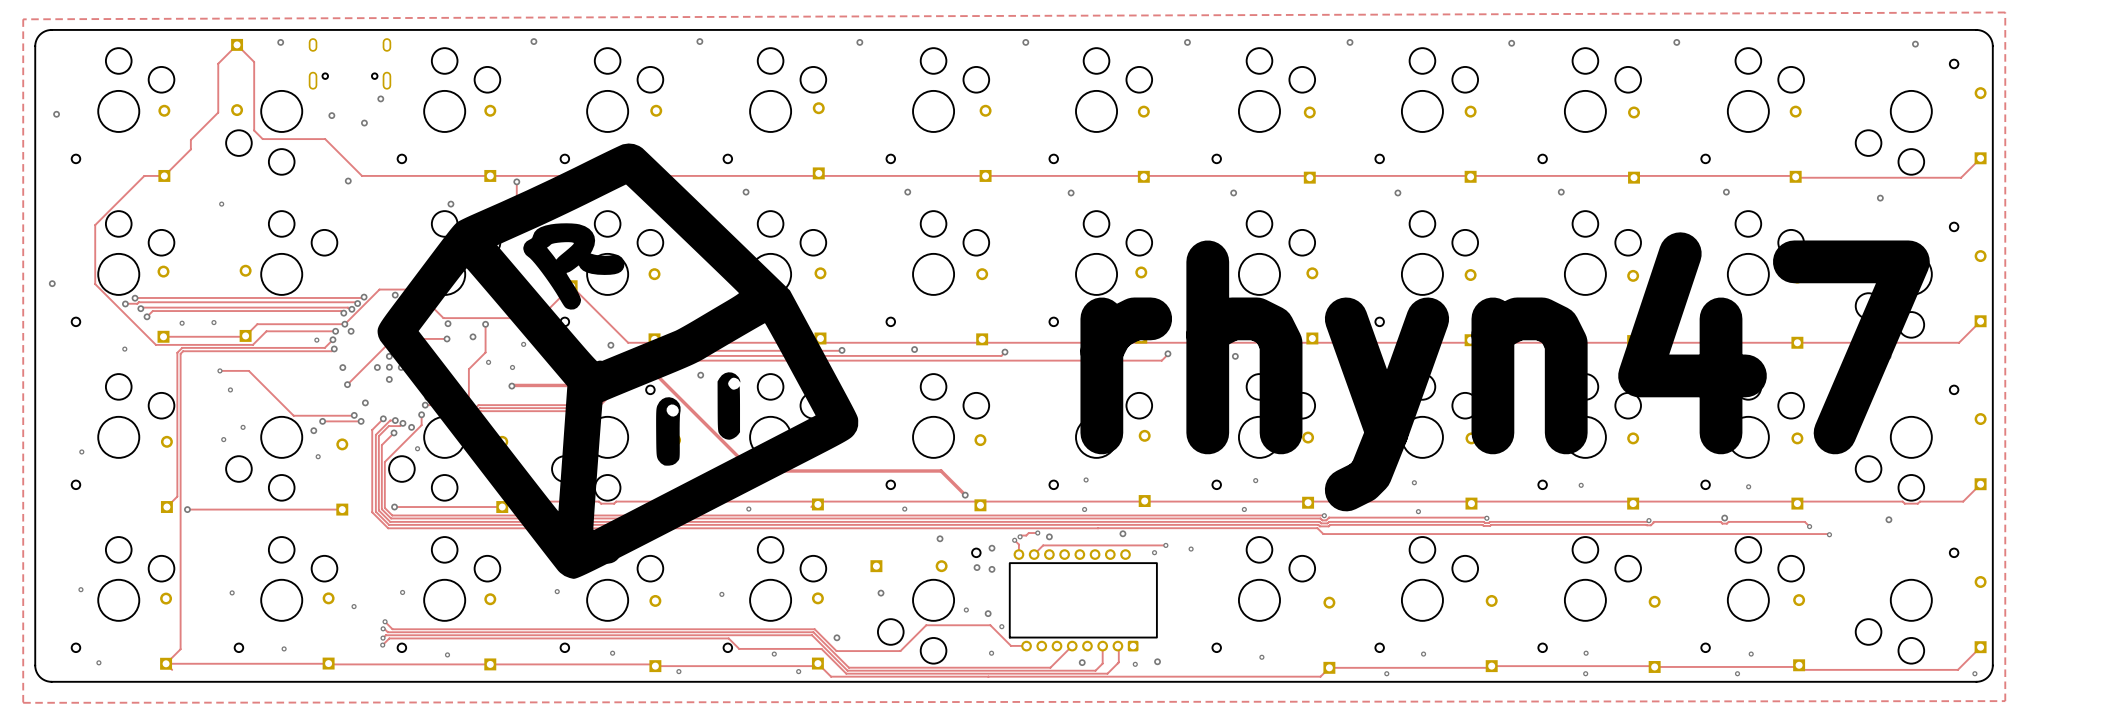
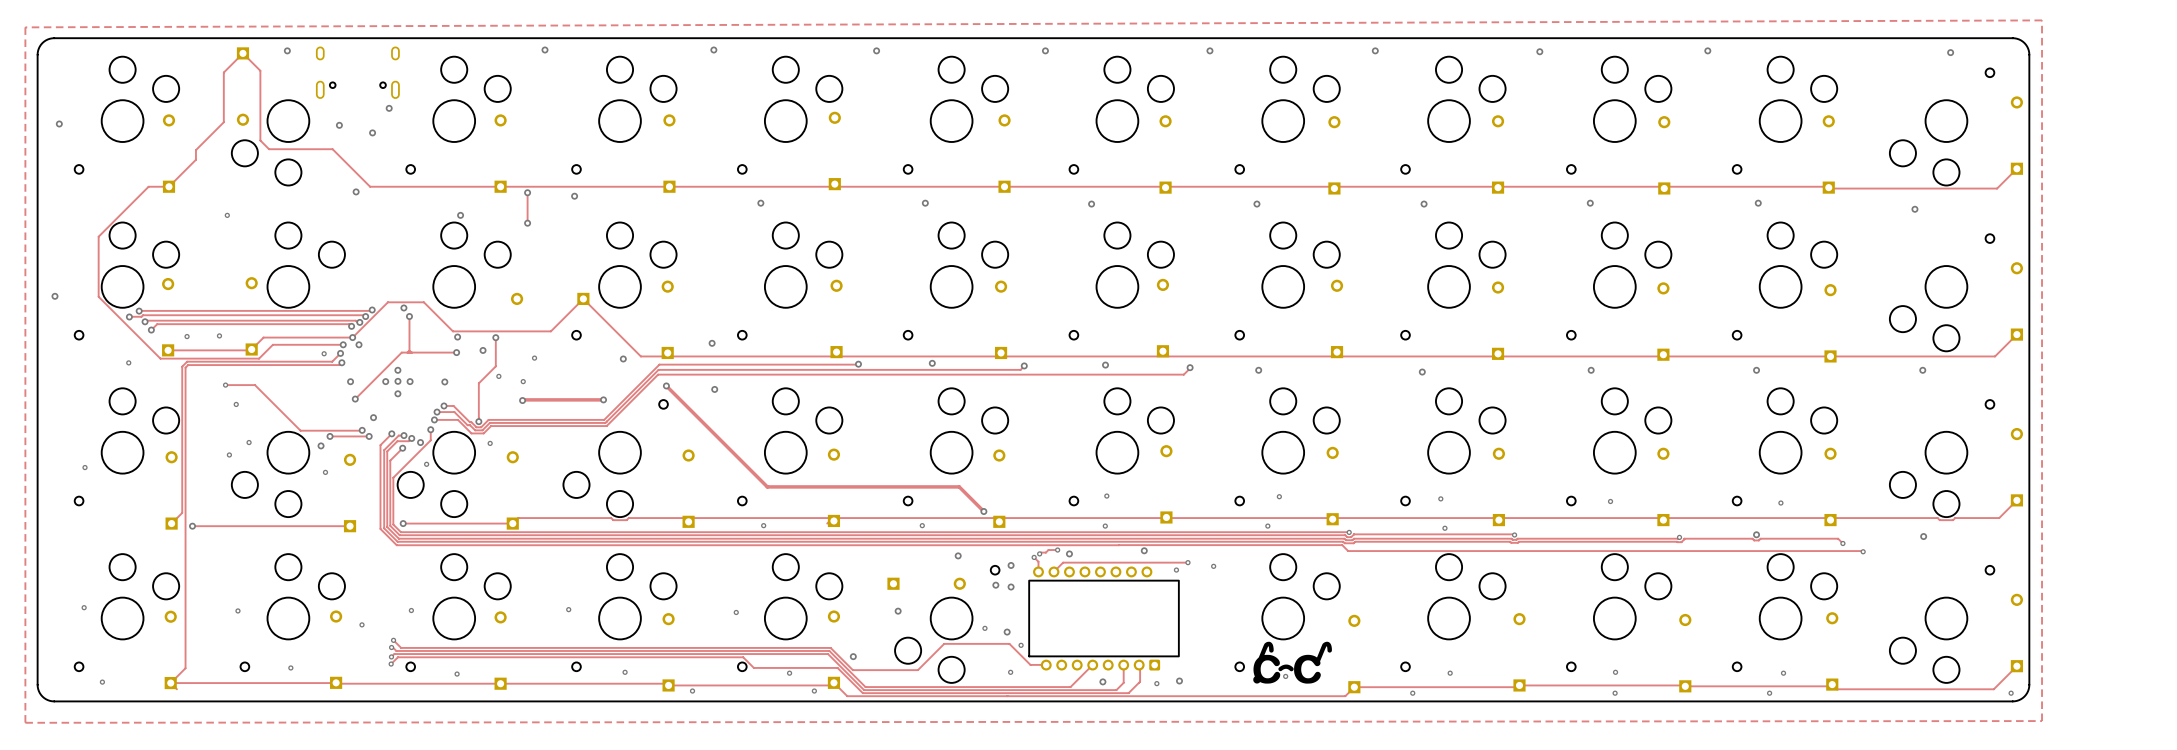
part: (617, 361) -> none
text: rhyn47 (1505, 371) -> none
drawing: none -> [1253, 641, 1332, 684]

